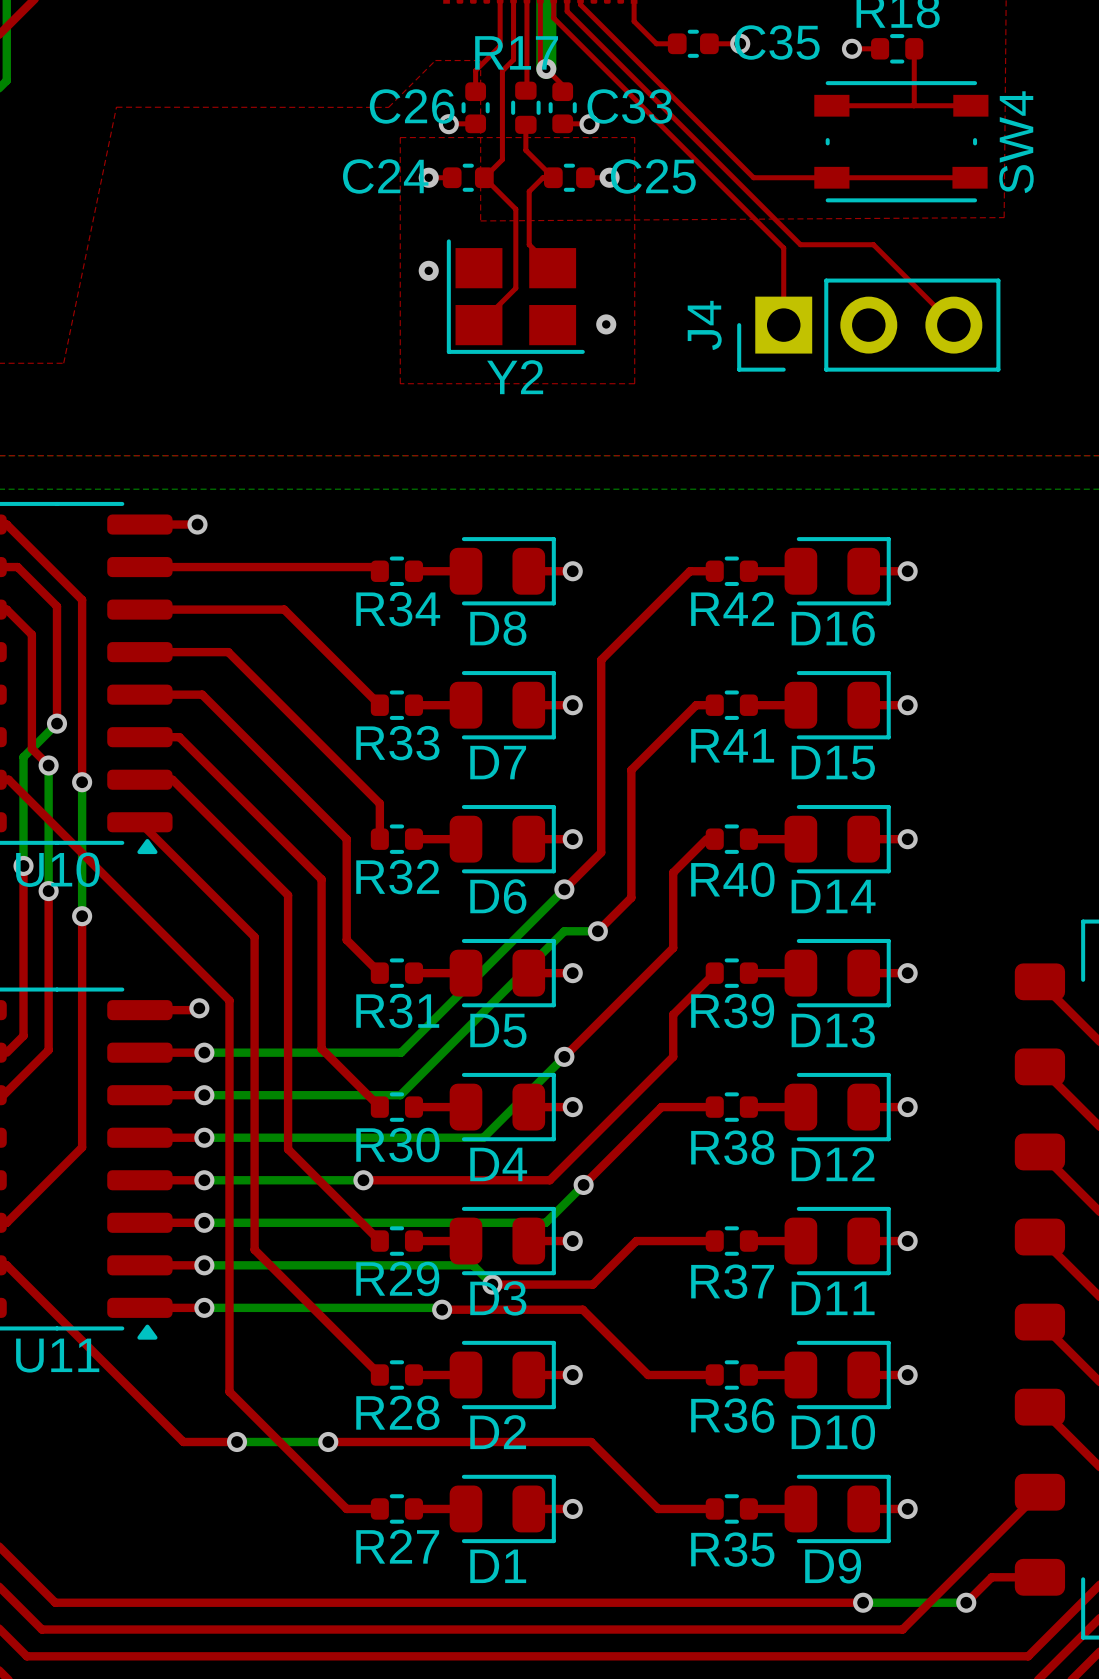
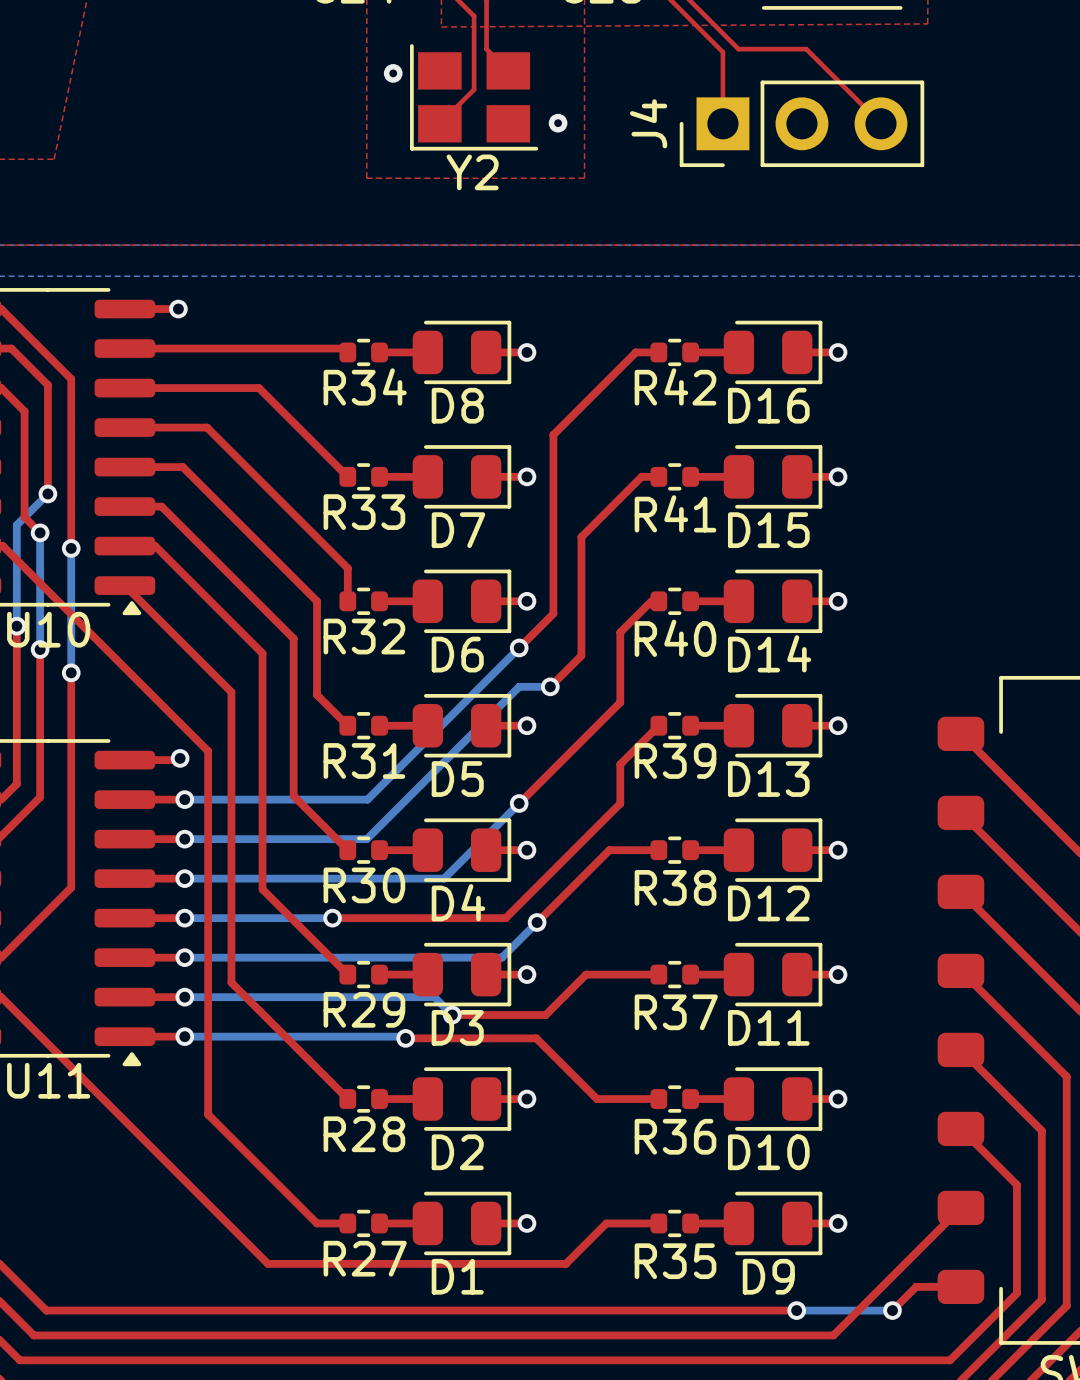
top track: (183, 1441) (237, 1441) -> none
bottom track: (237, 1441) (328, 1441) -> none
via: (237, 1441) -> none
top track: (328, 1441) (591, 1441) (658, 1508) -> (165, 1161) (268, 1263) (565, 1263) (606, 1223)
via: (328, 1441) -> none

